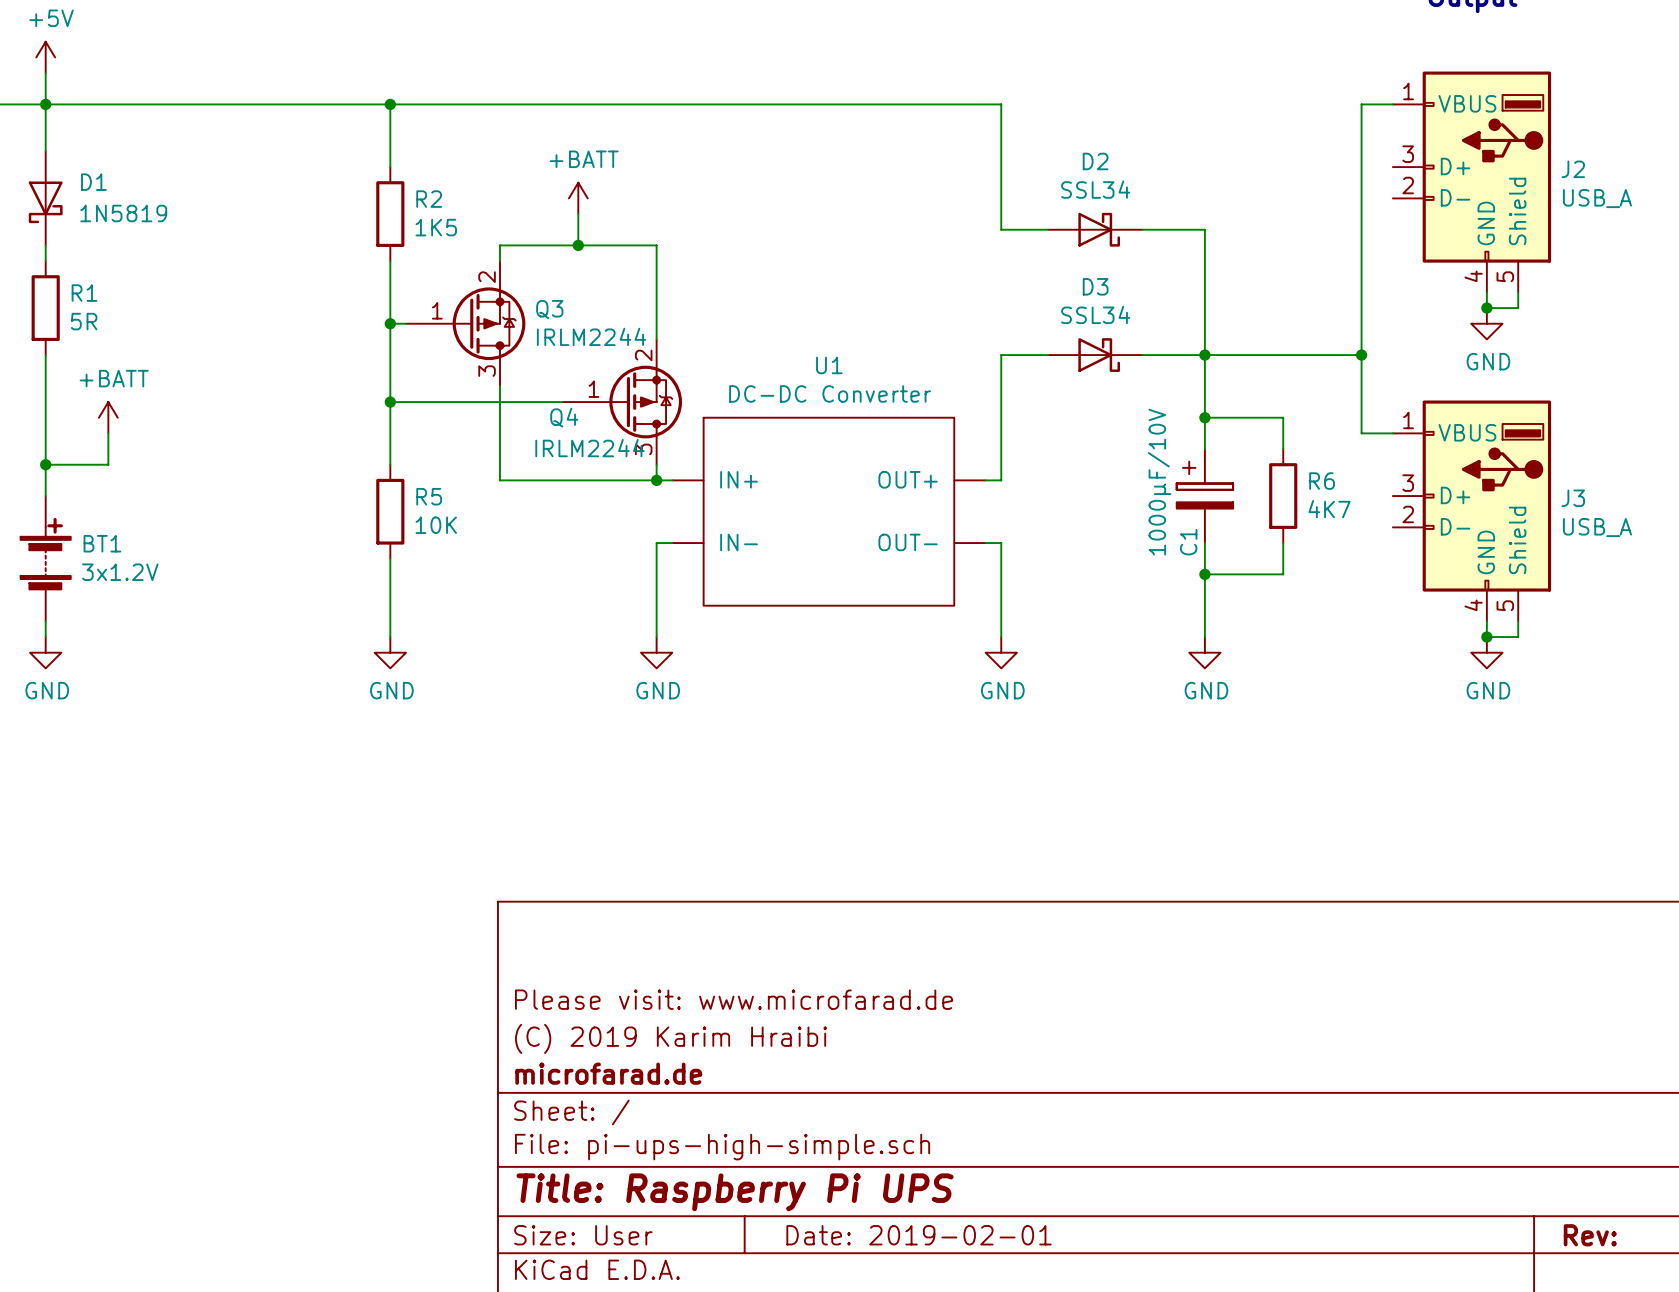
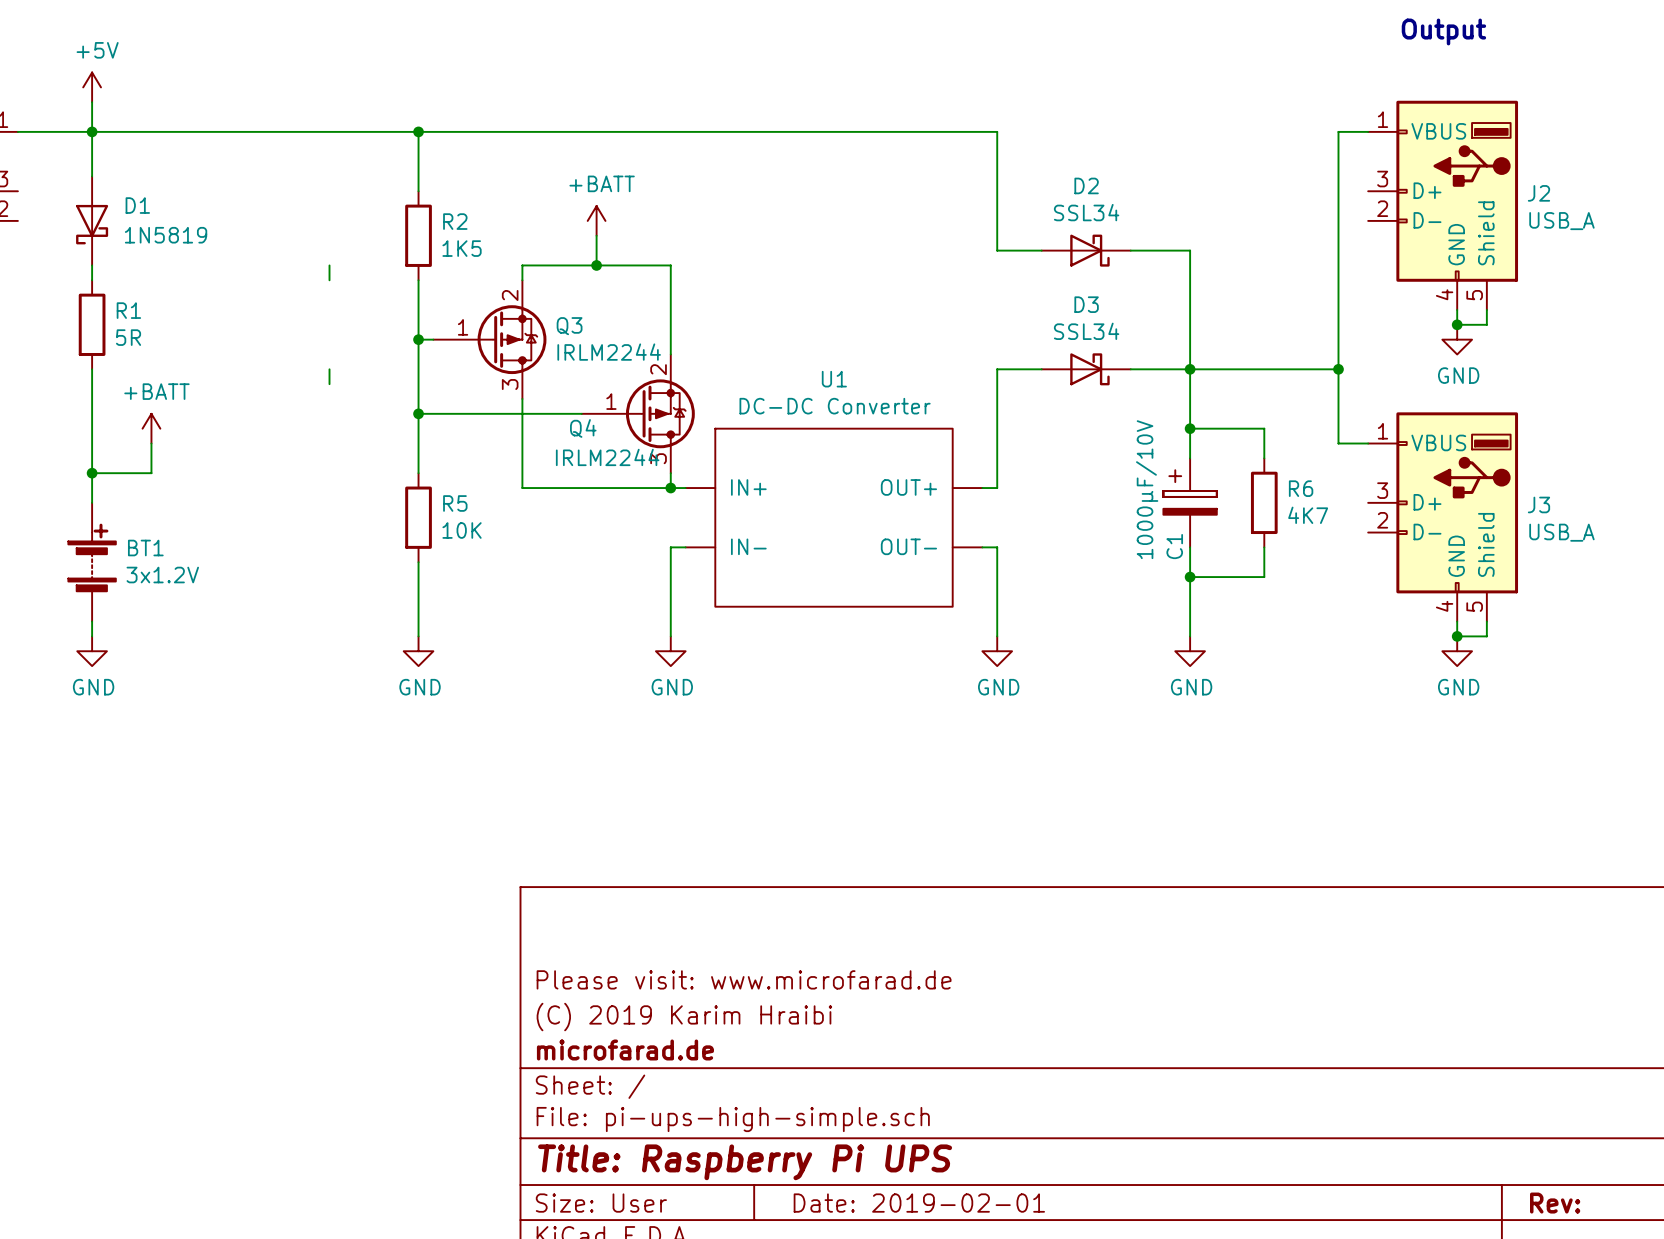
wire: none -> (329, 265) (329, 280)
wire: none -> (329, 369) (329, 384)

